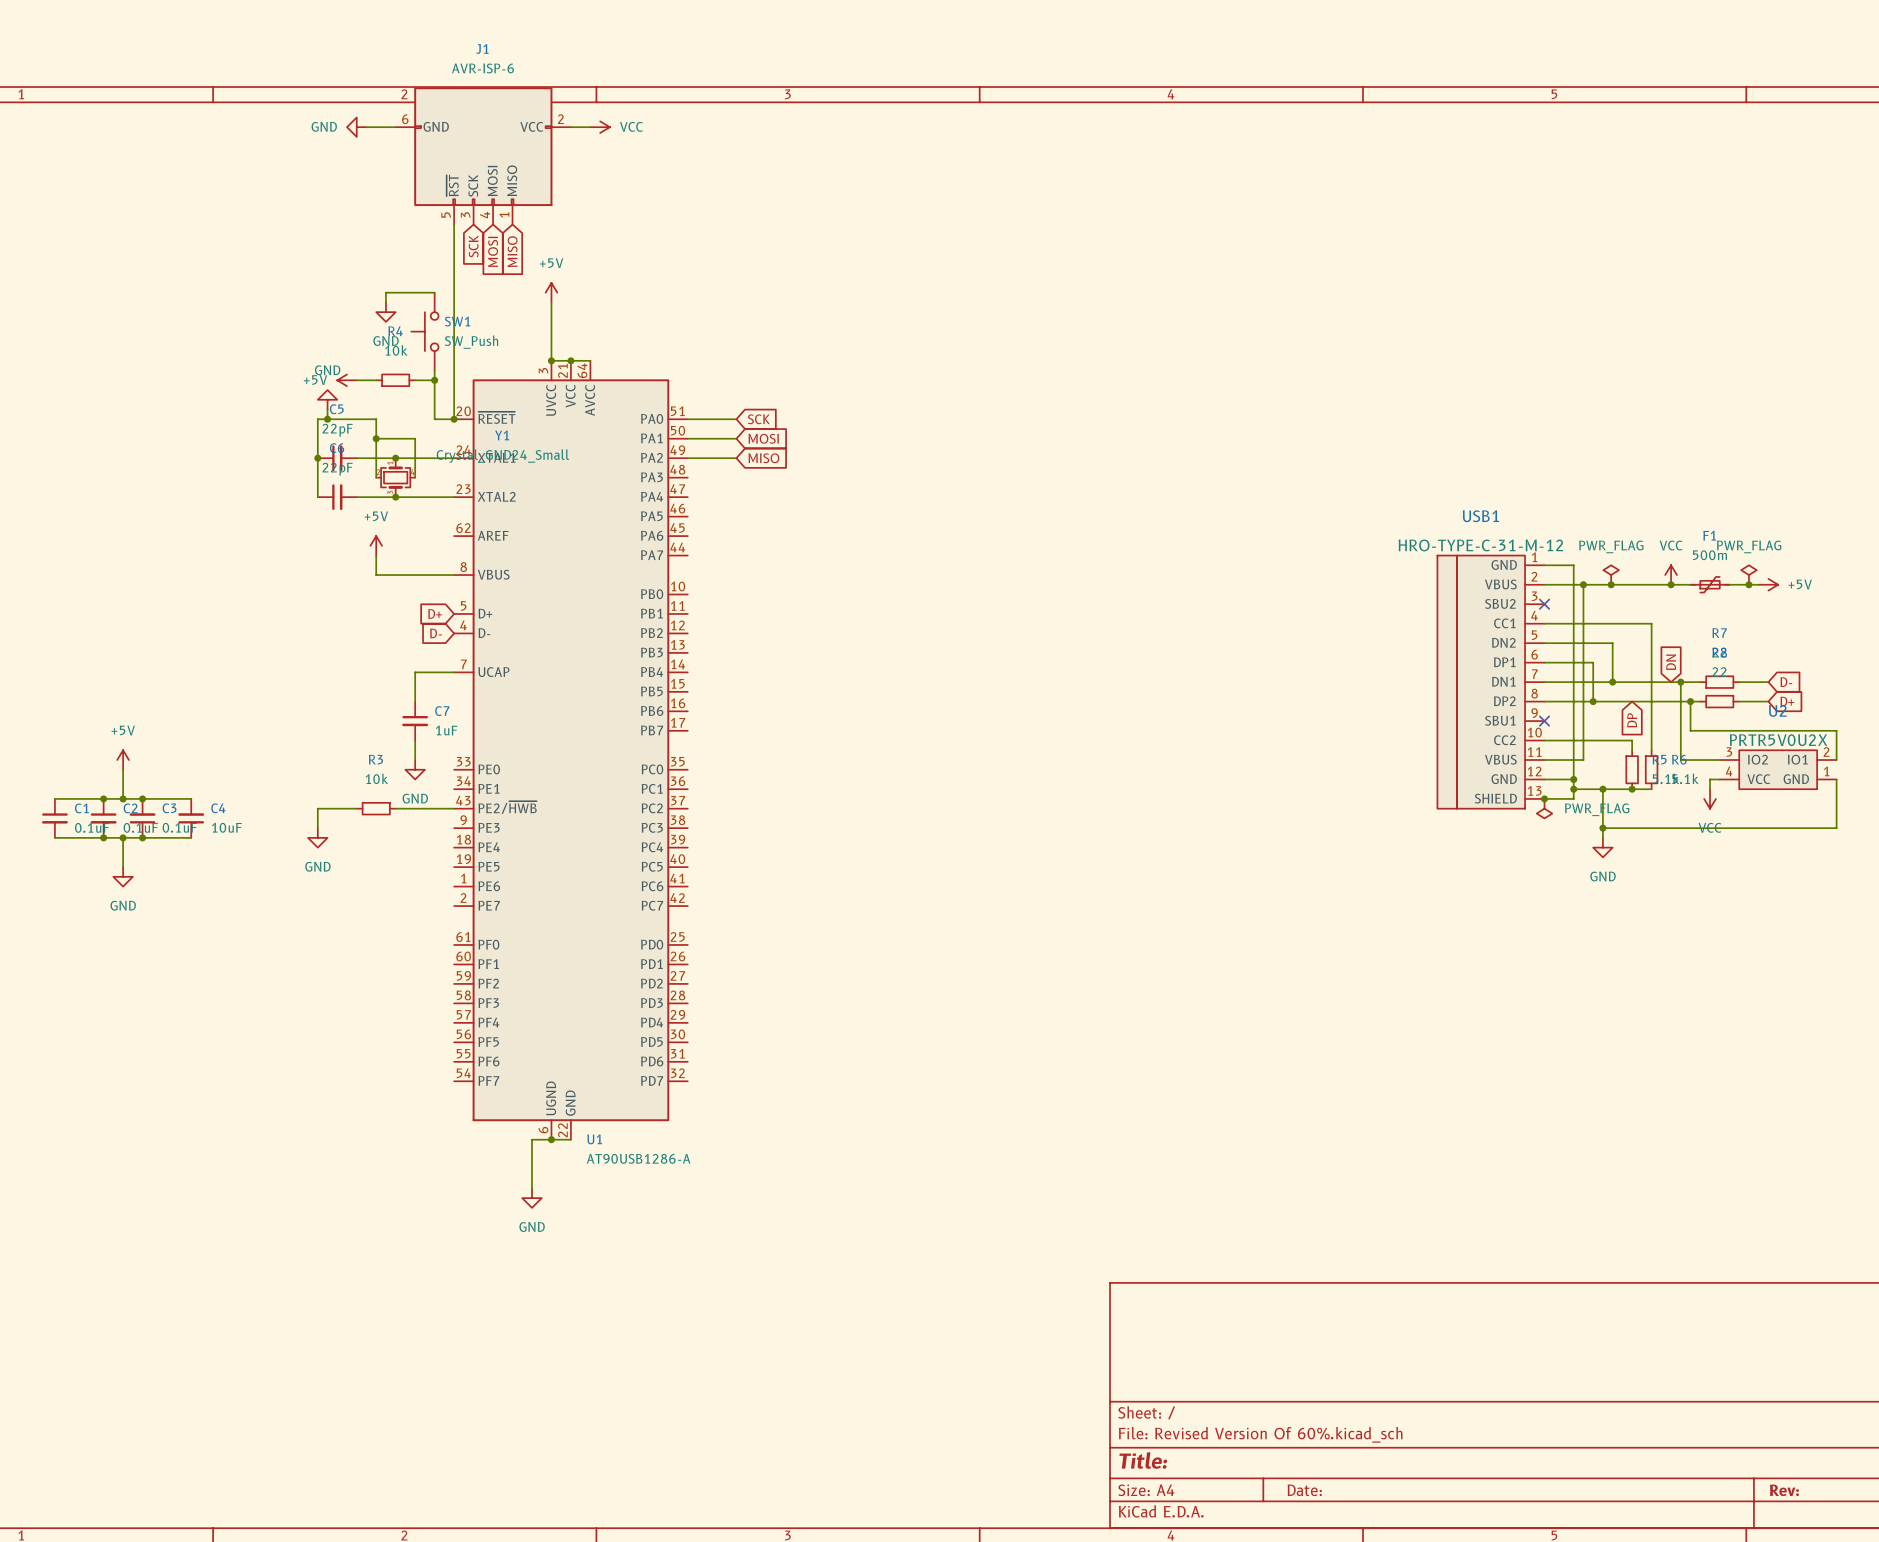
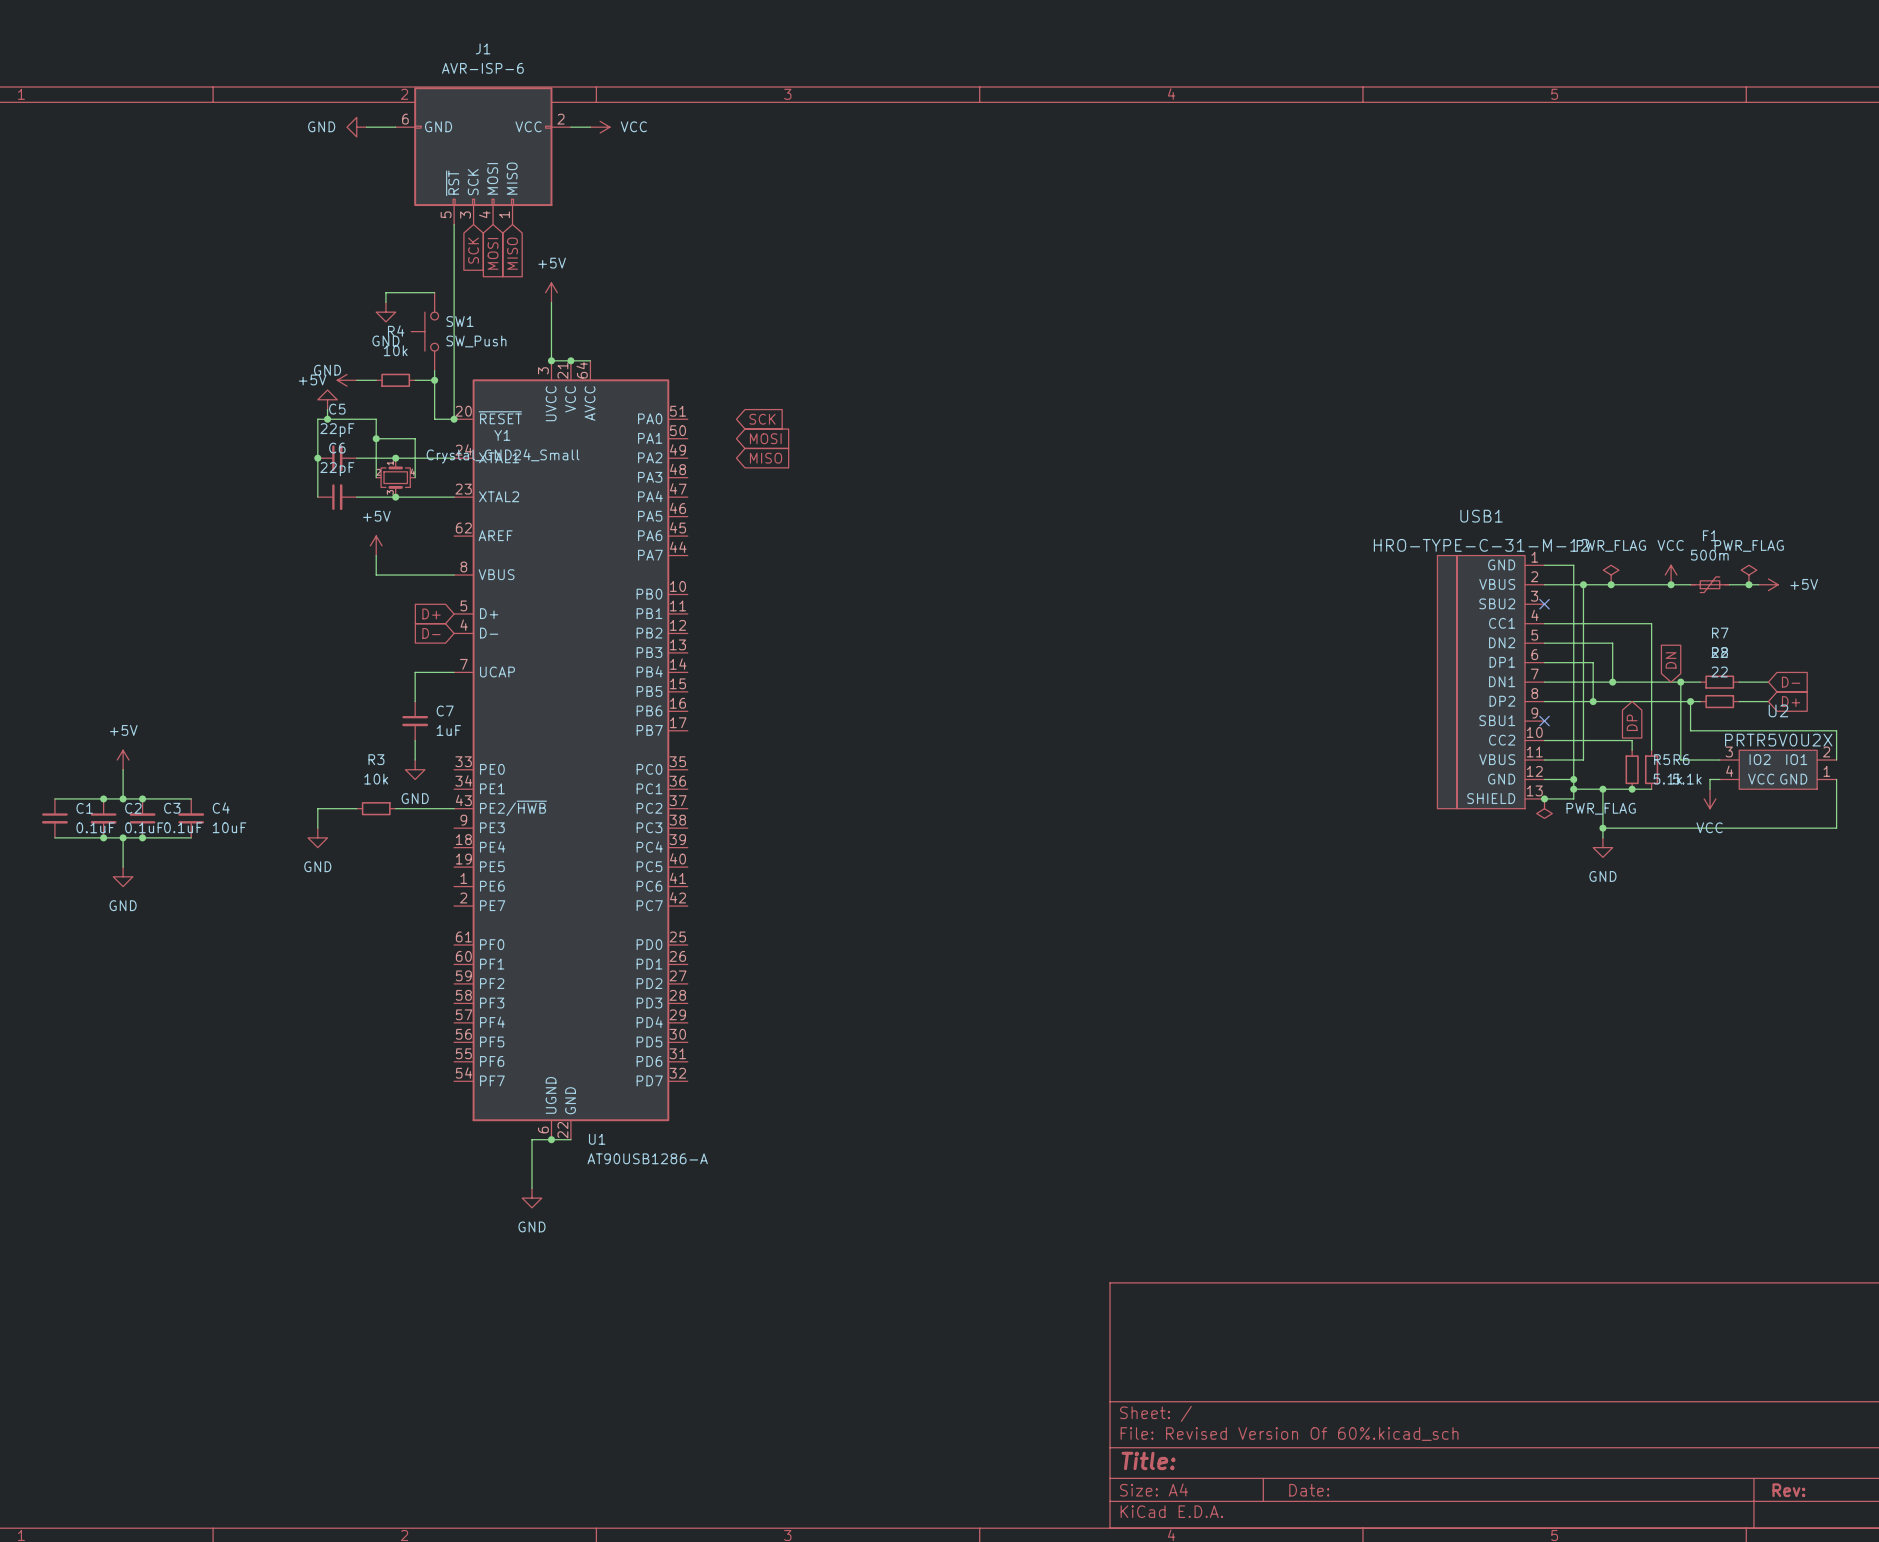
wire: (687, 419) (736, 419) -> none
wire: (687, 438) (736, 438) -> none
wire: (687, 458) (736, 458) -> none

